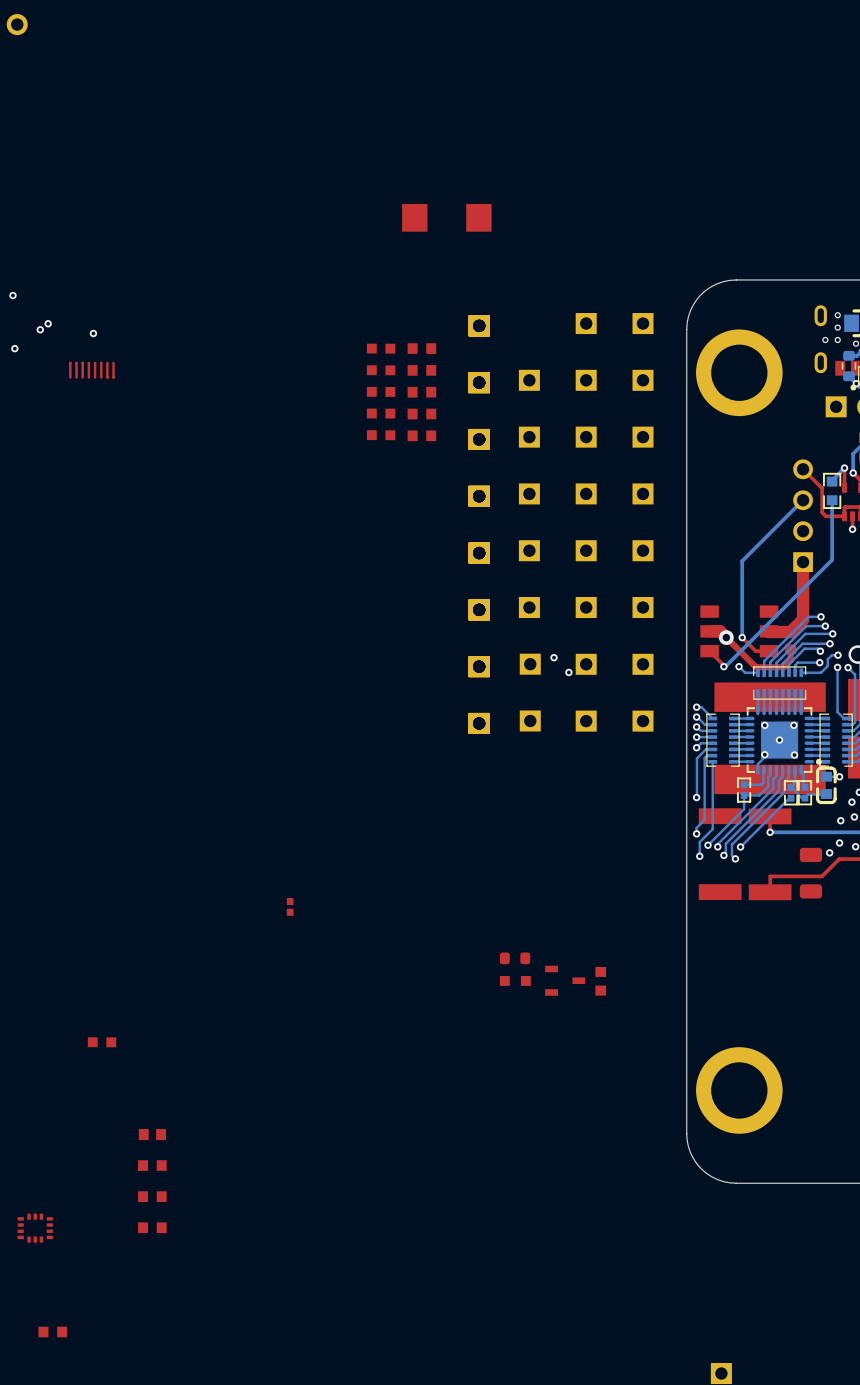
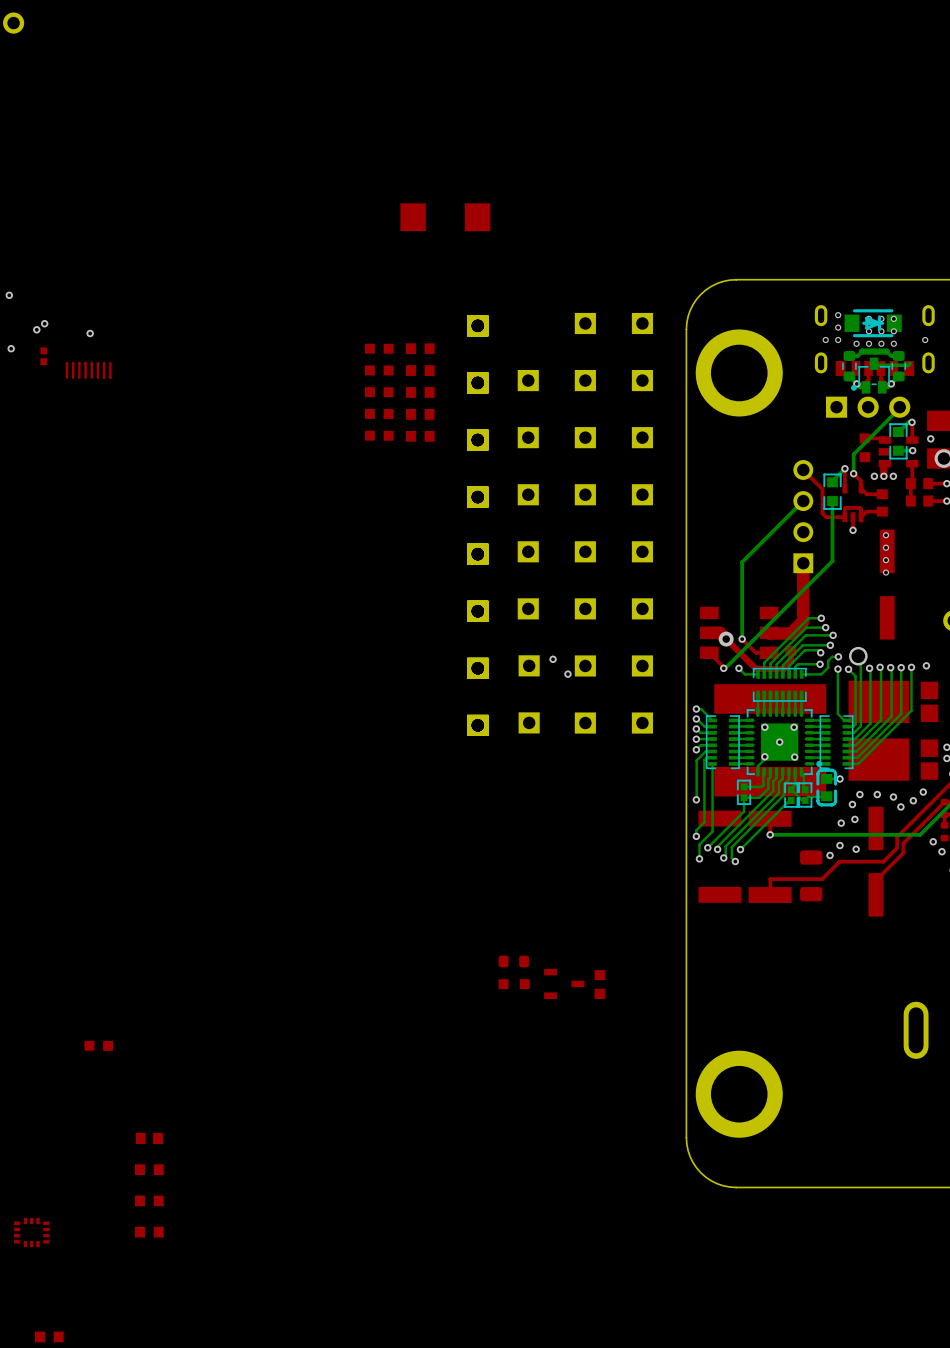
part: none -> (43, 356)
part: (290, 906) -> none

